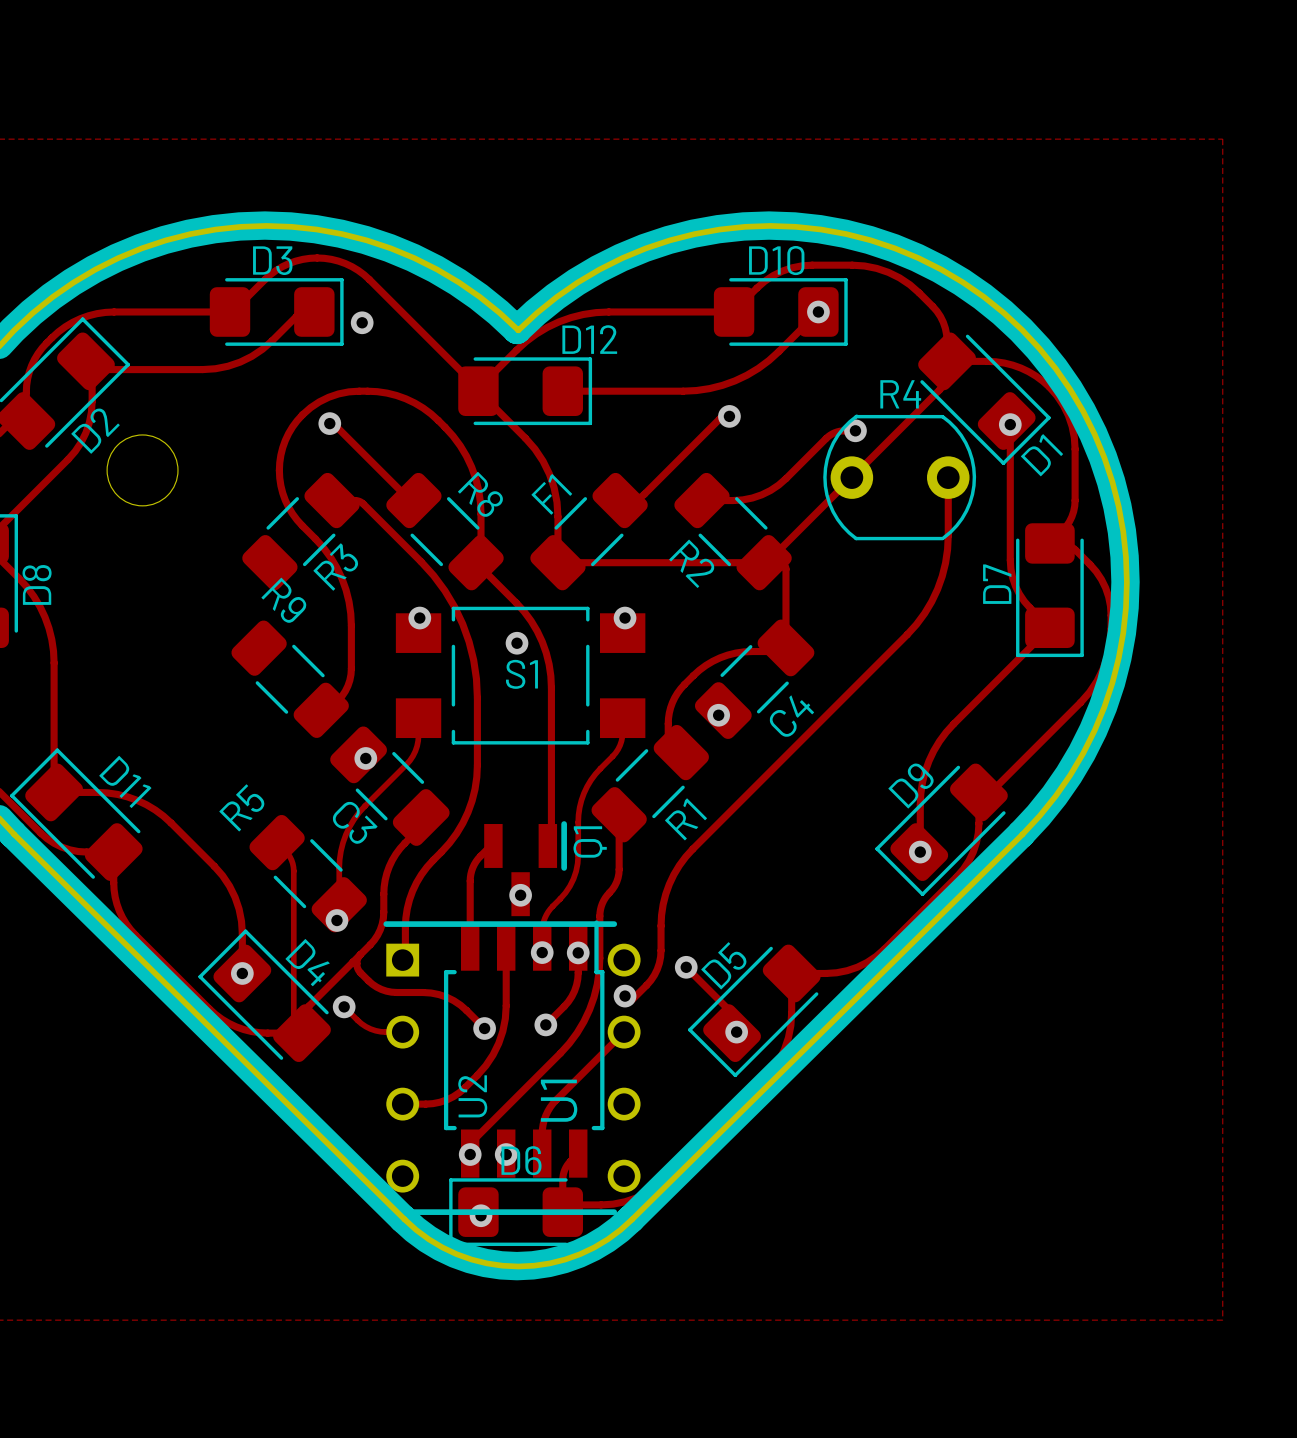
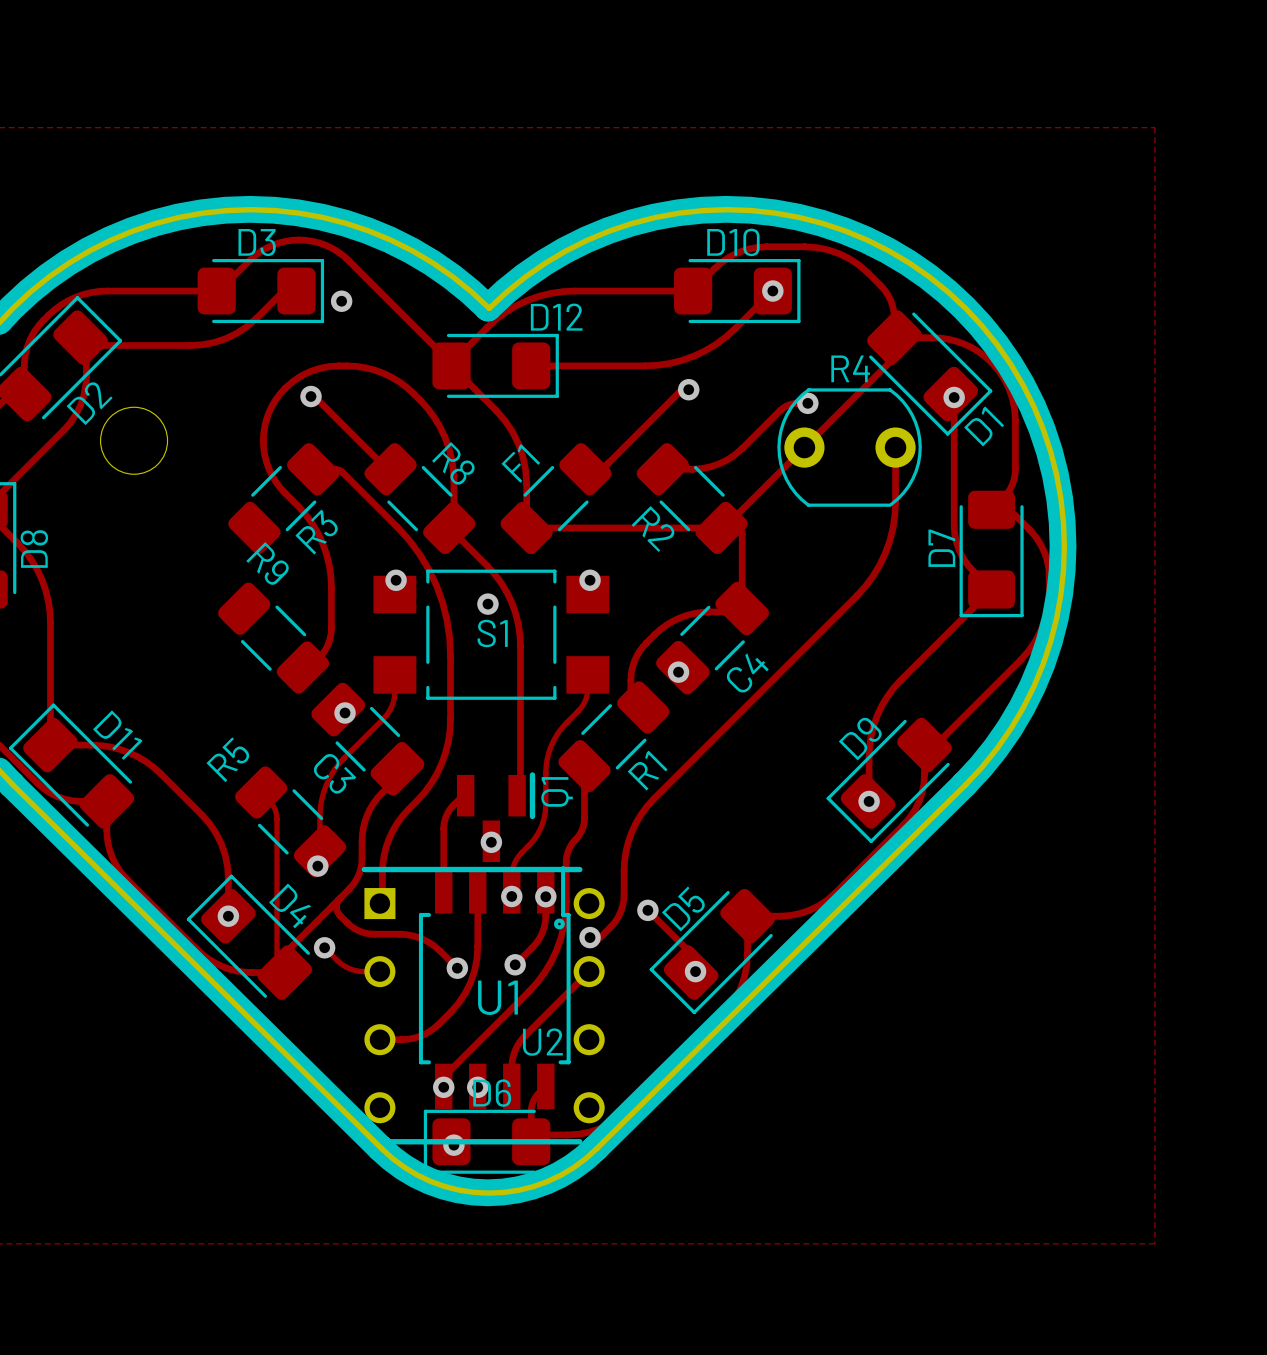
drawing: none -> [554, 918, 565, 930]
U2 name rotation: 0° (472, 1096) -> 90° clockwise (542, 1042)
U2 name position: U2 (472, 1096) -> U2 (542, 1042)
U1 name rotation: 0° (559, 1100) -> 90° clockwise (497, 997)

